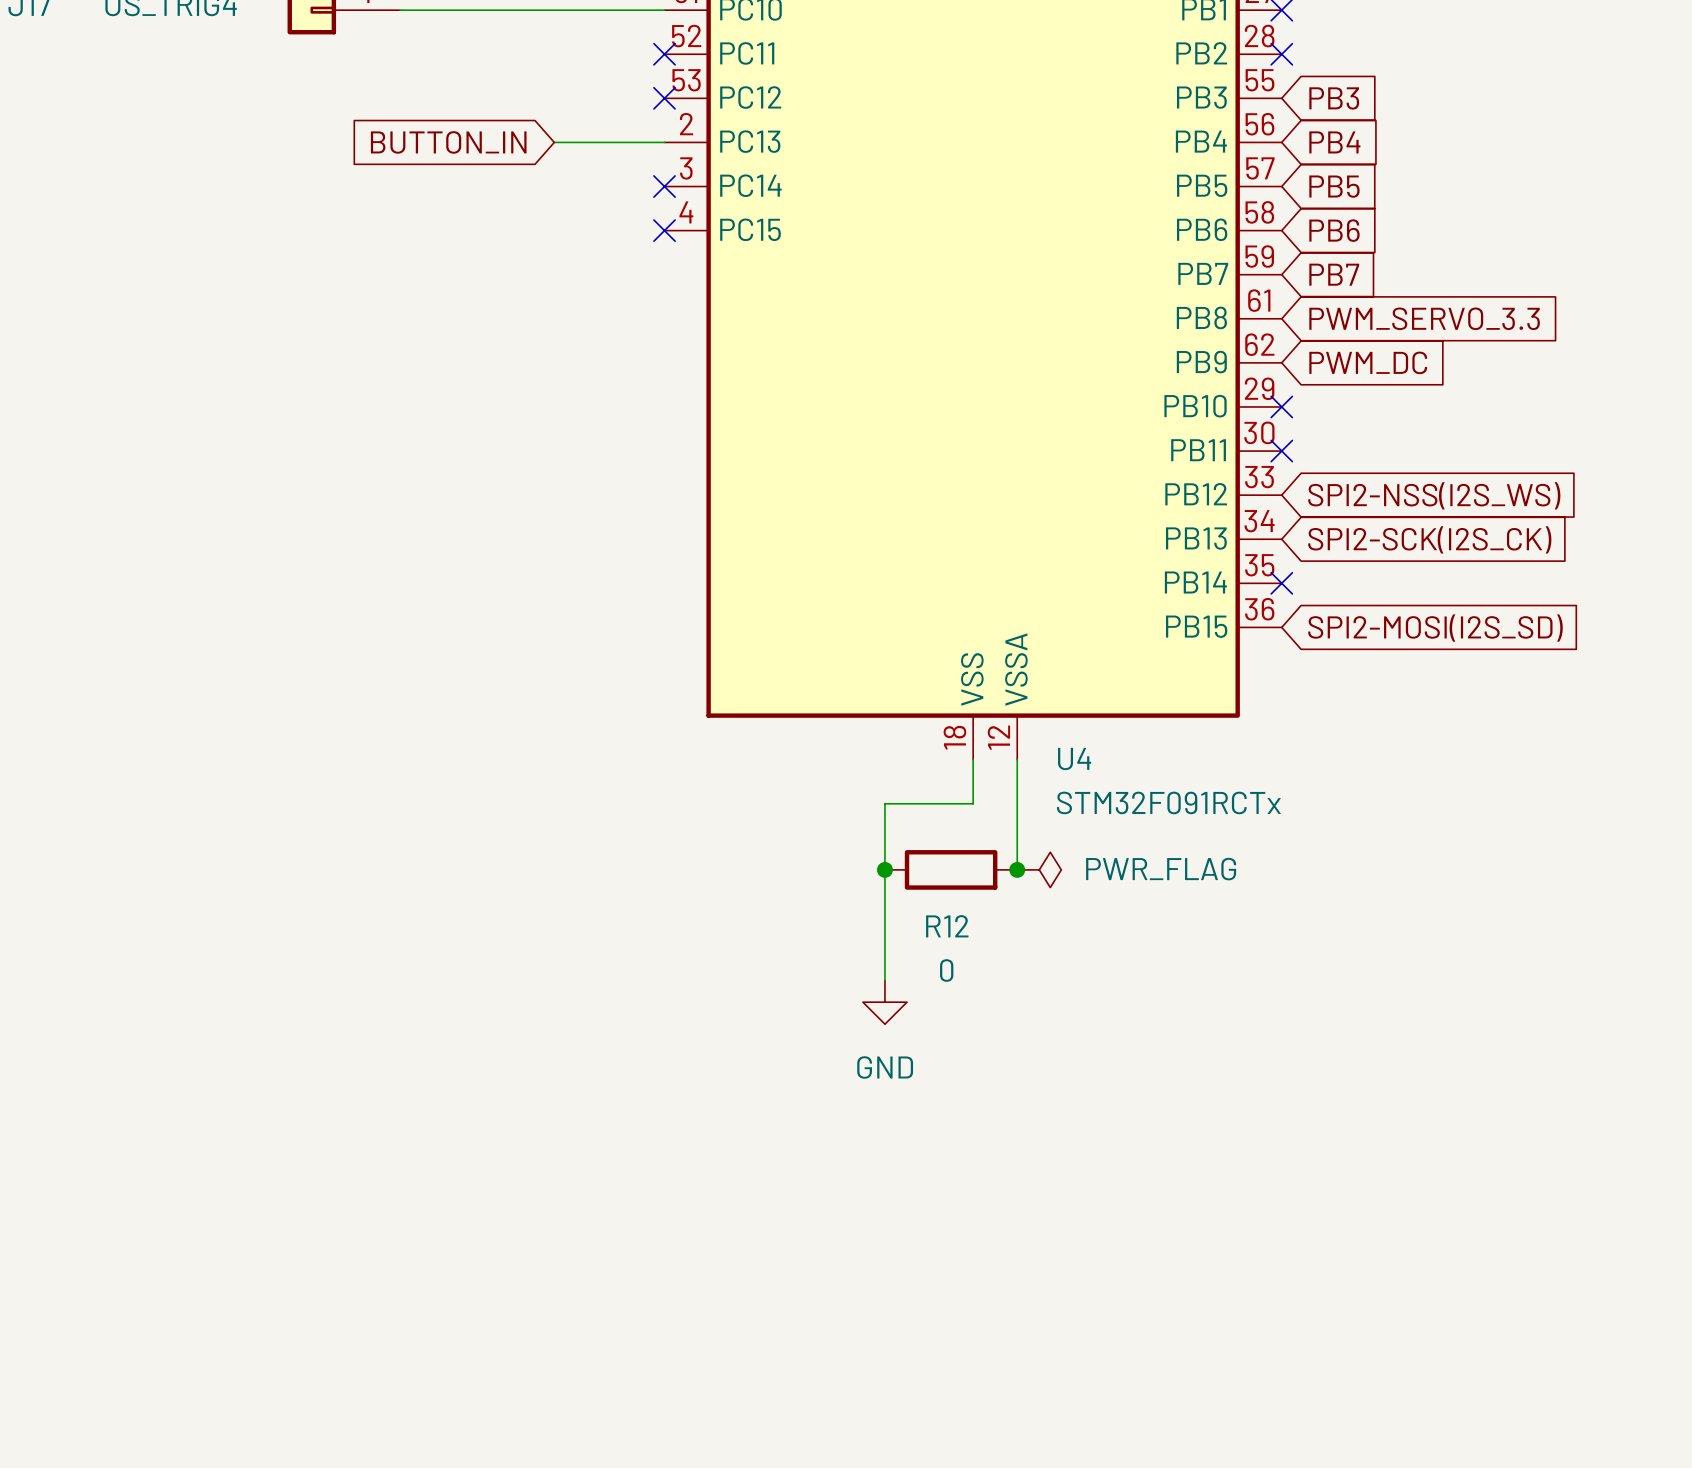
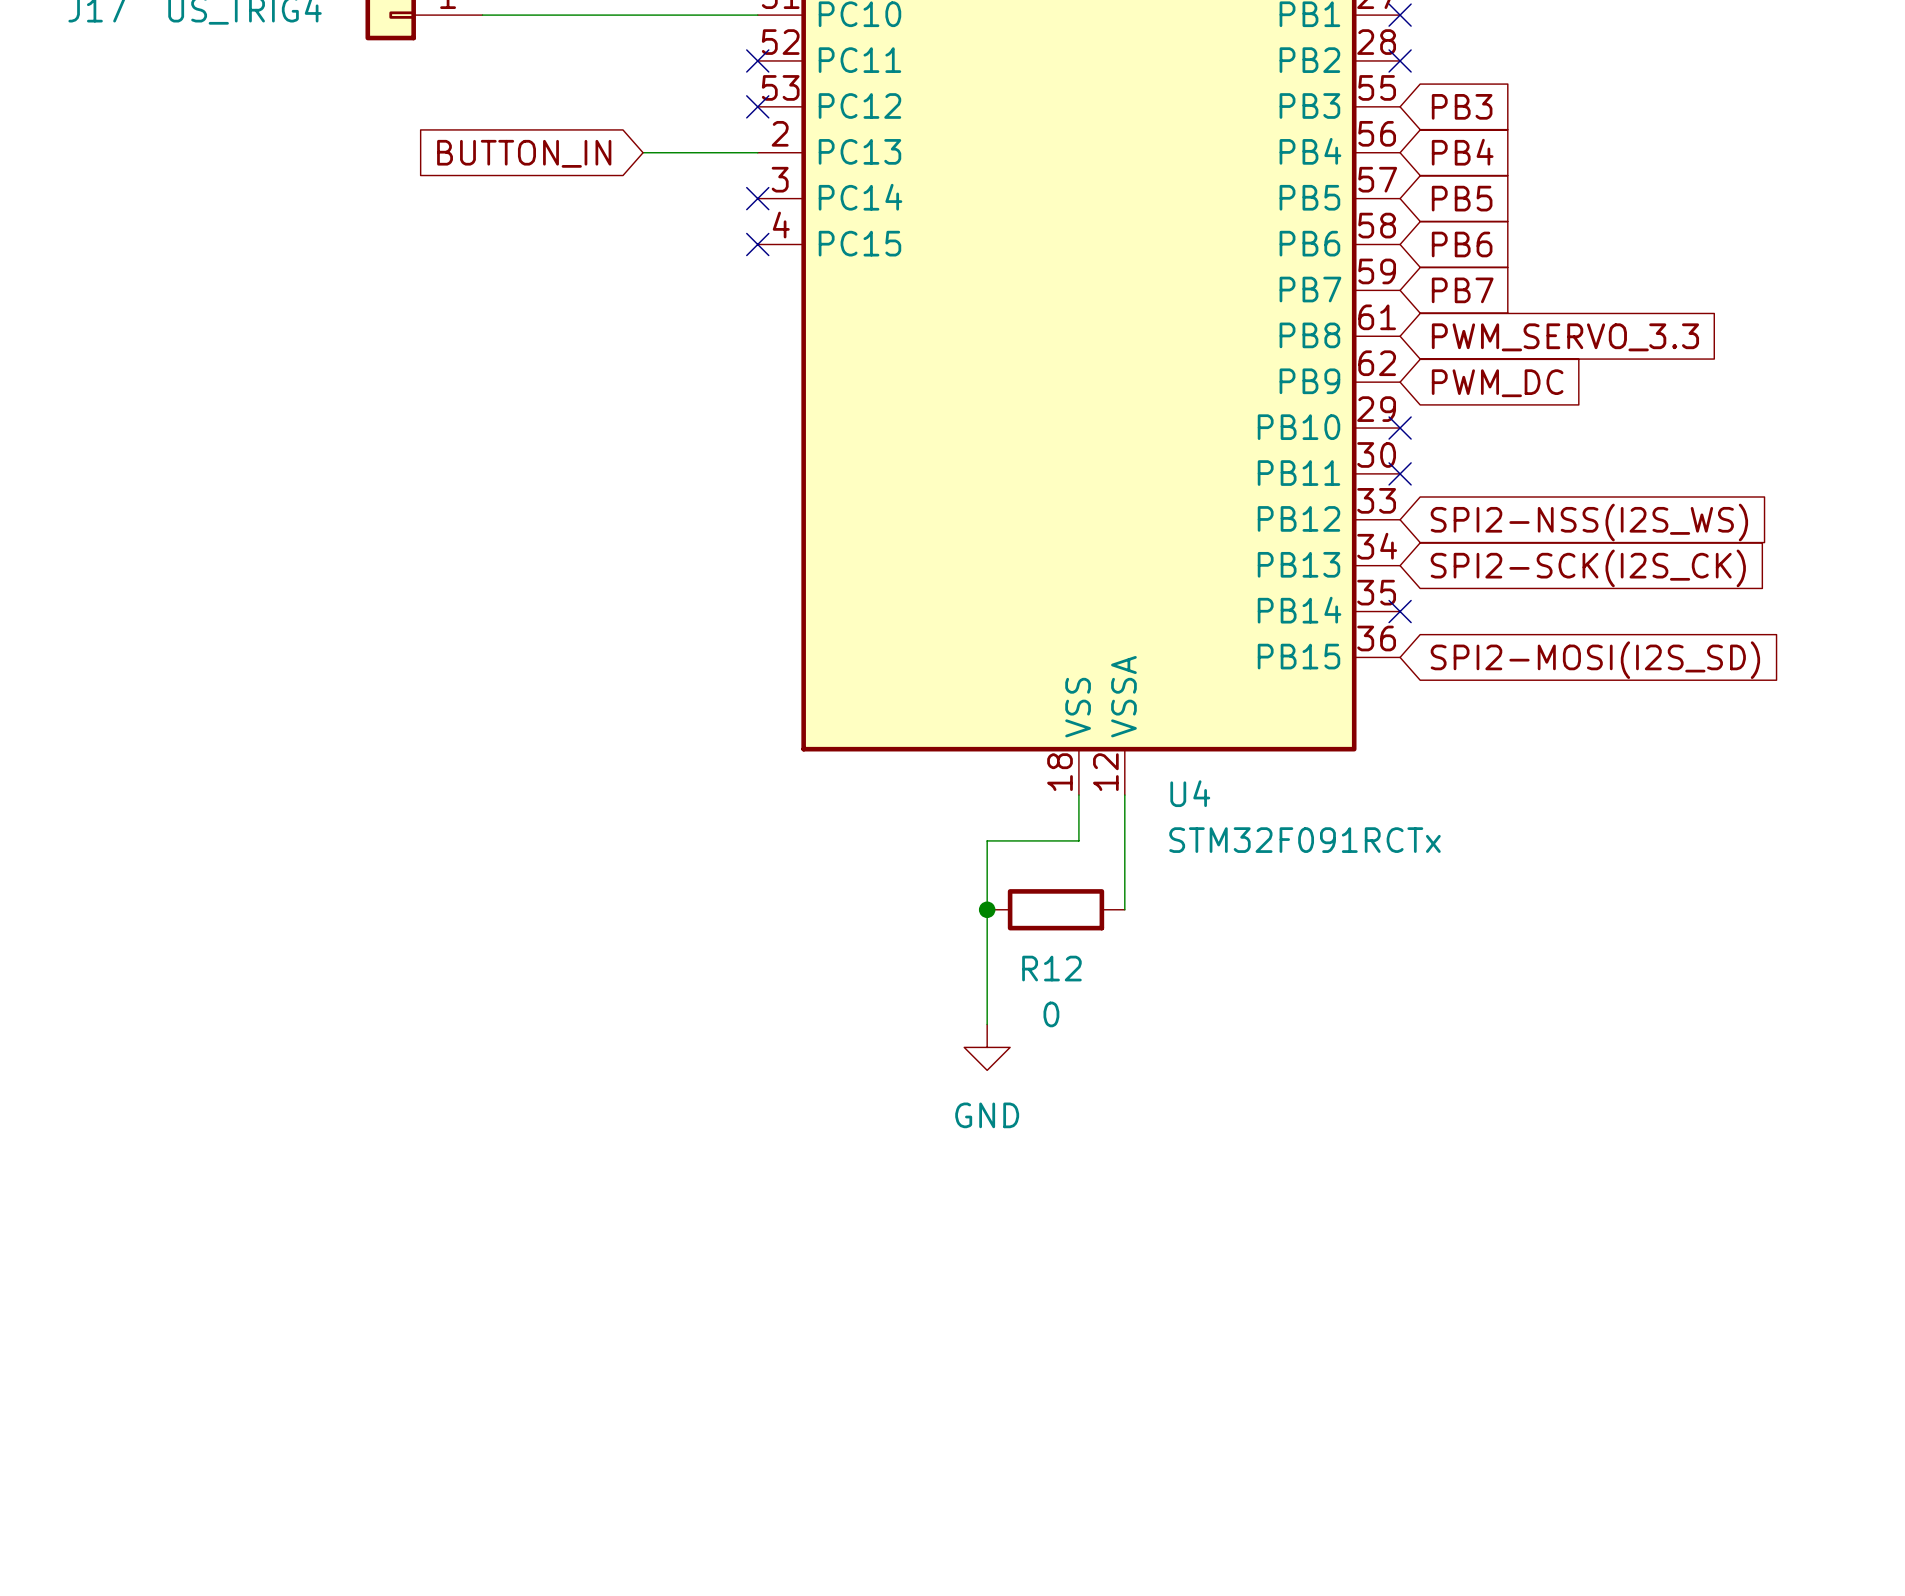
junction: (1017, 869) -> none
power symbol: PWR_FLAG (1039, 869) -> none

